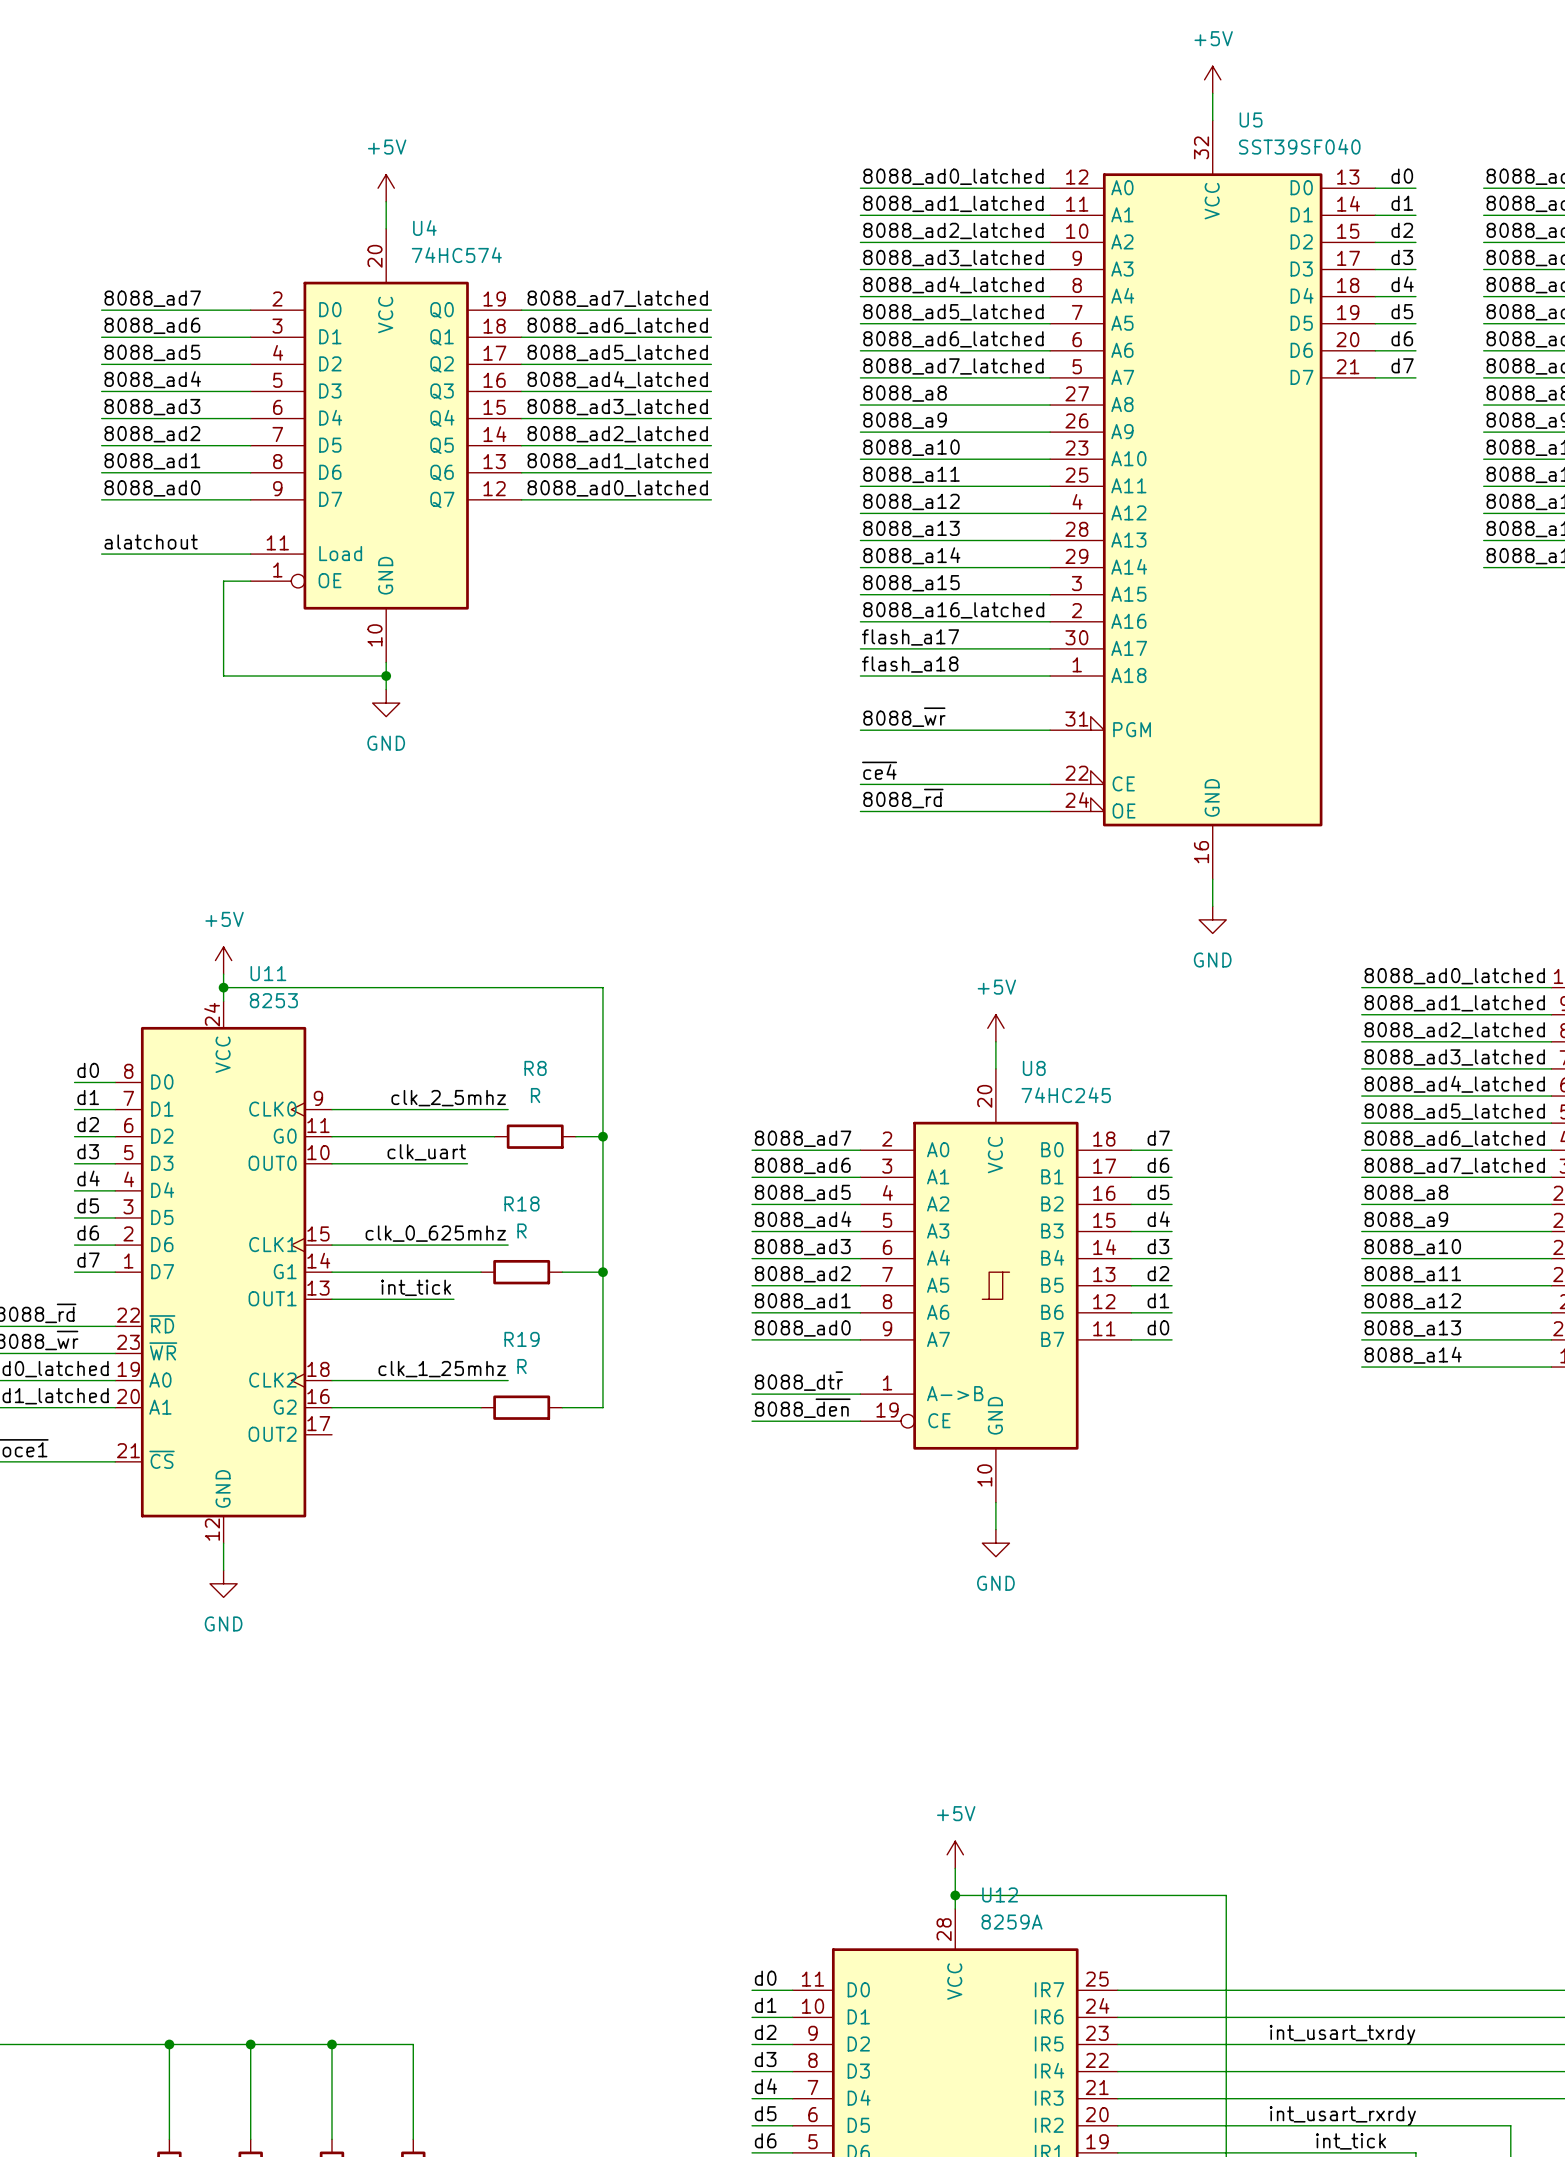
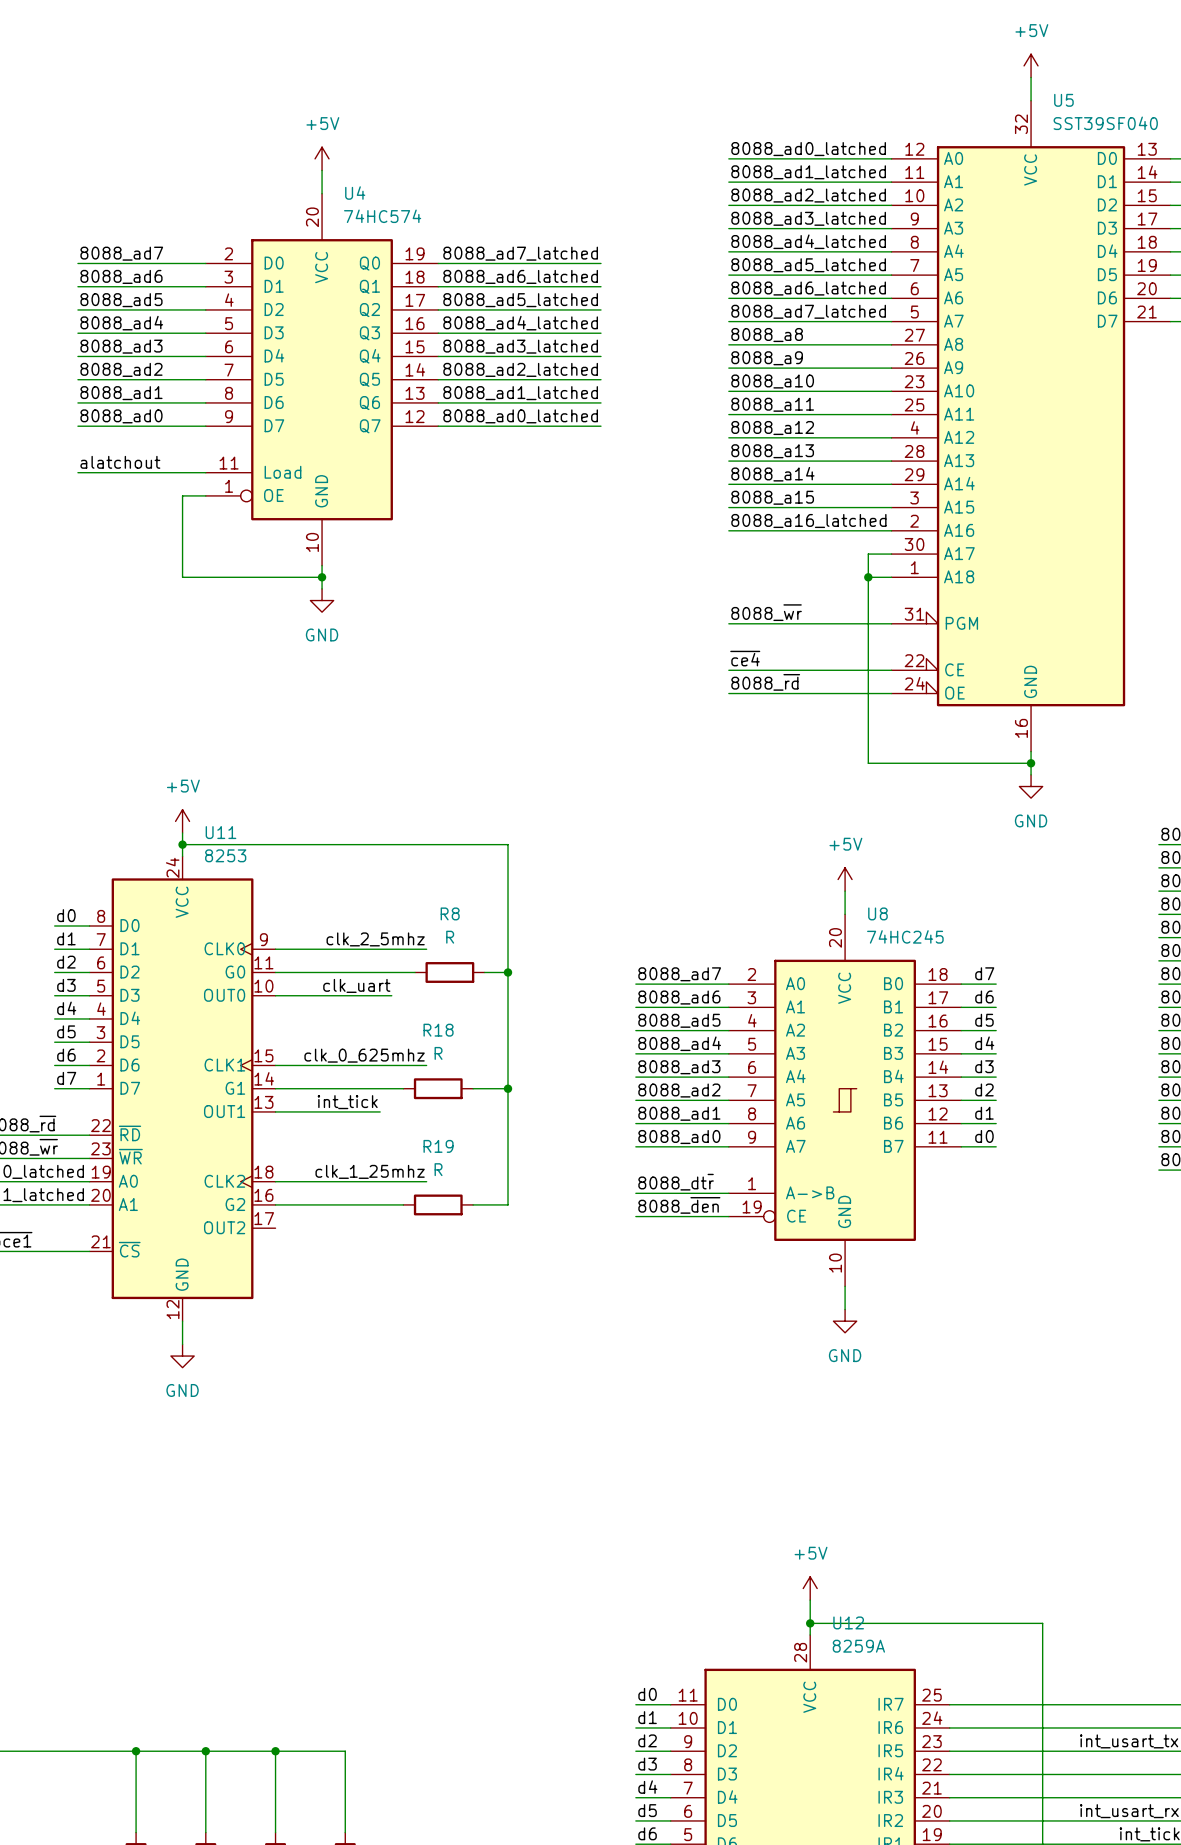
label: flash_a17 (910, 637) -> none
wire: (860, 648) (1023, 648) -> (1031, 763) (868, 763) (868, 554)
label: flash_a18 (910, 664) -> none
wire: (860, 676) (1023, 676) -> none
junction: none -> (868, 577)
junction: none -> (1031, 763)

